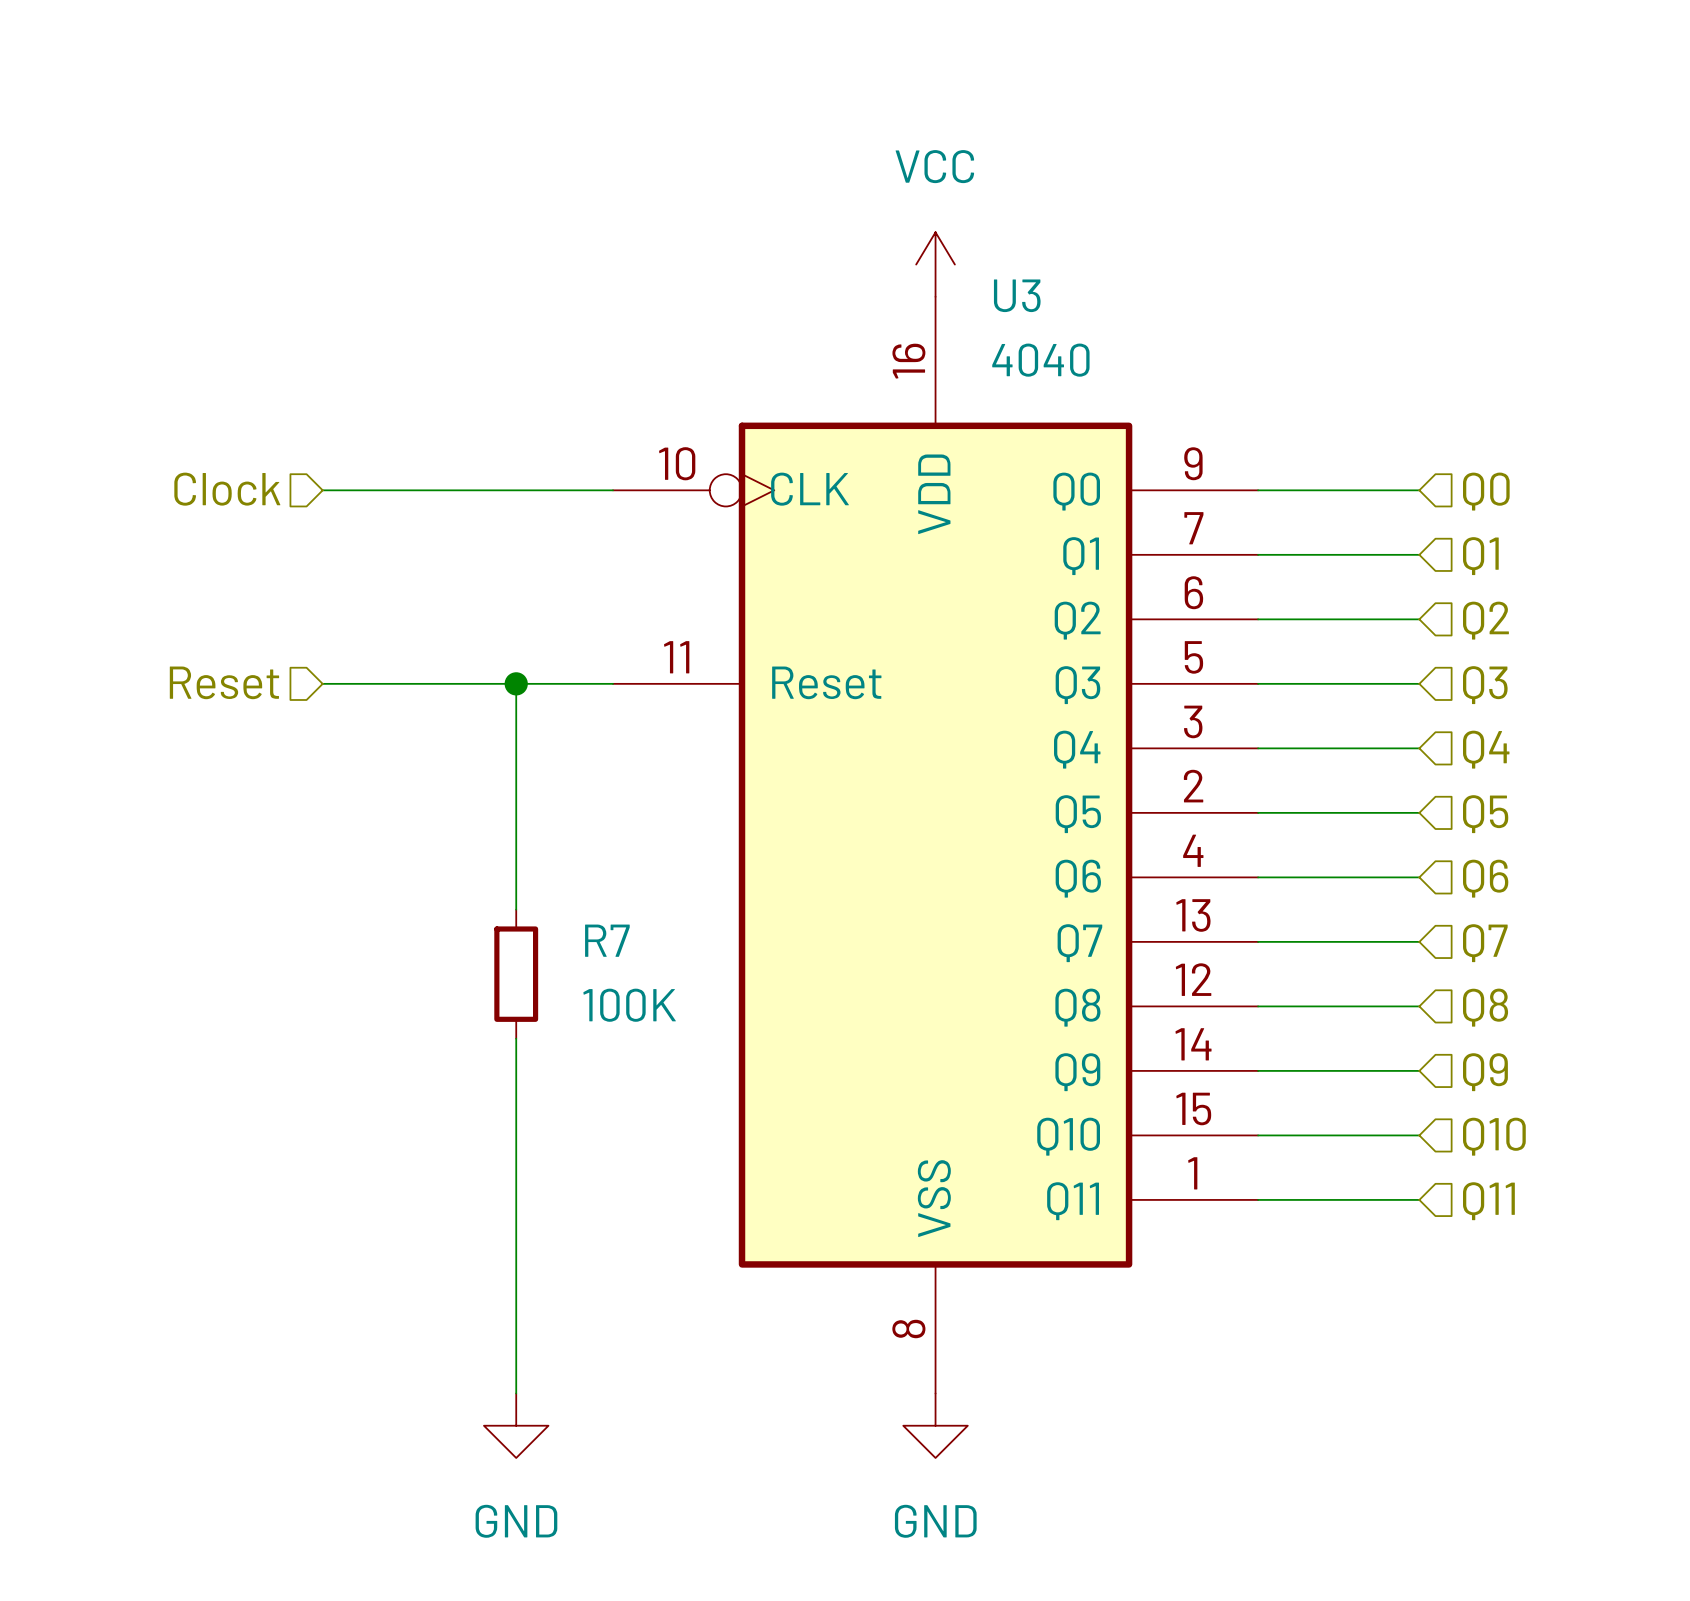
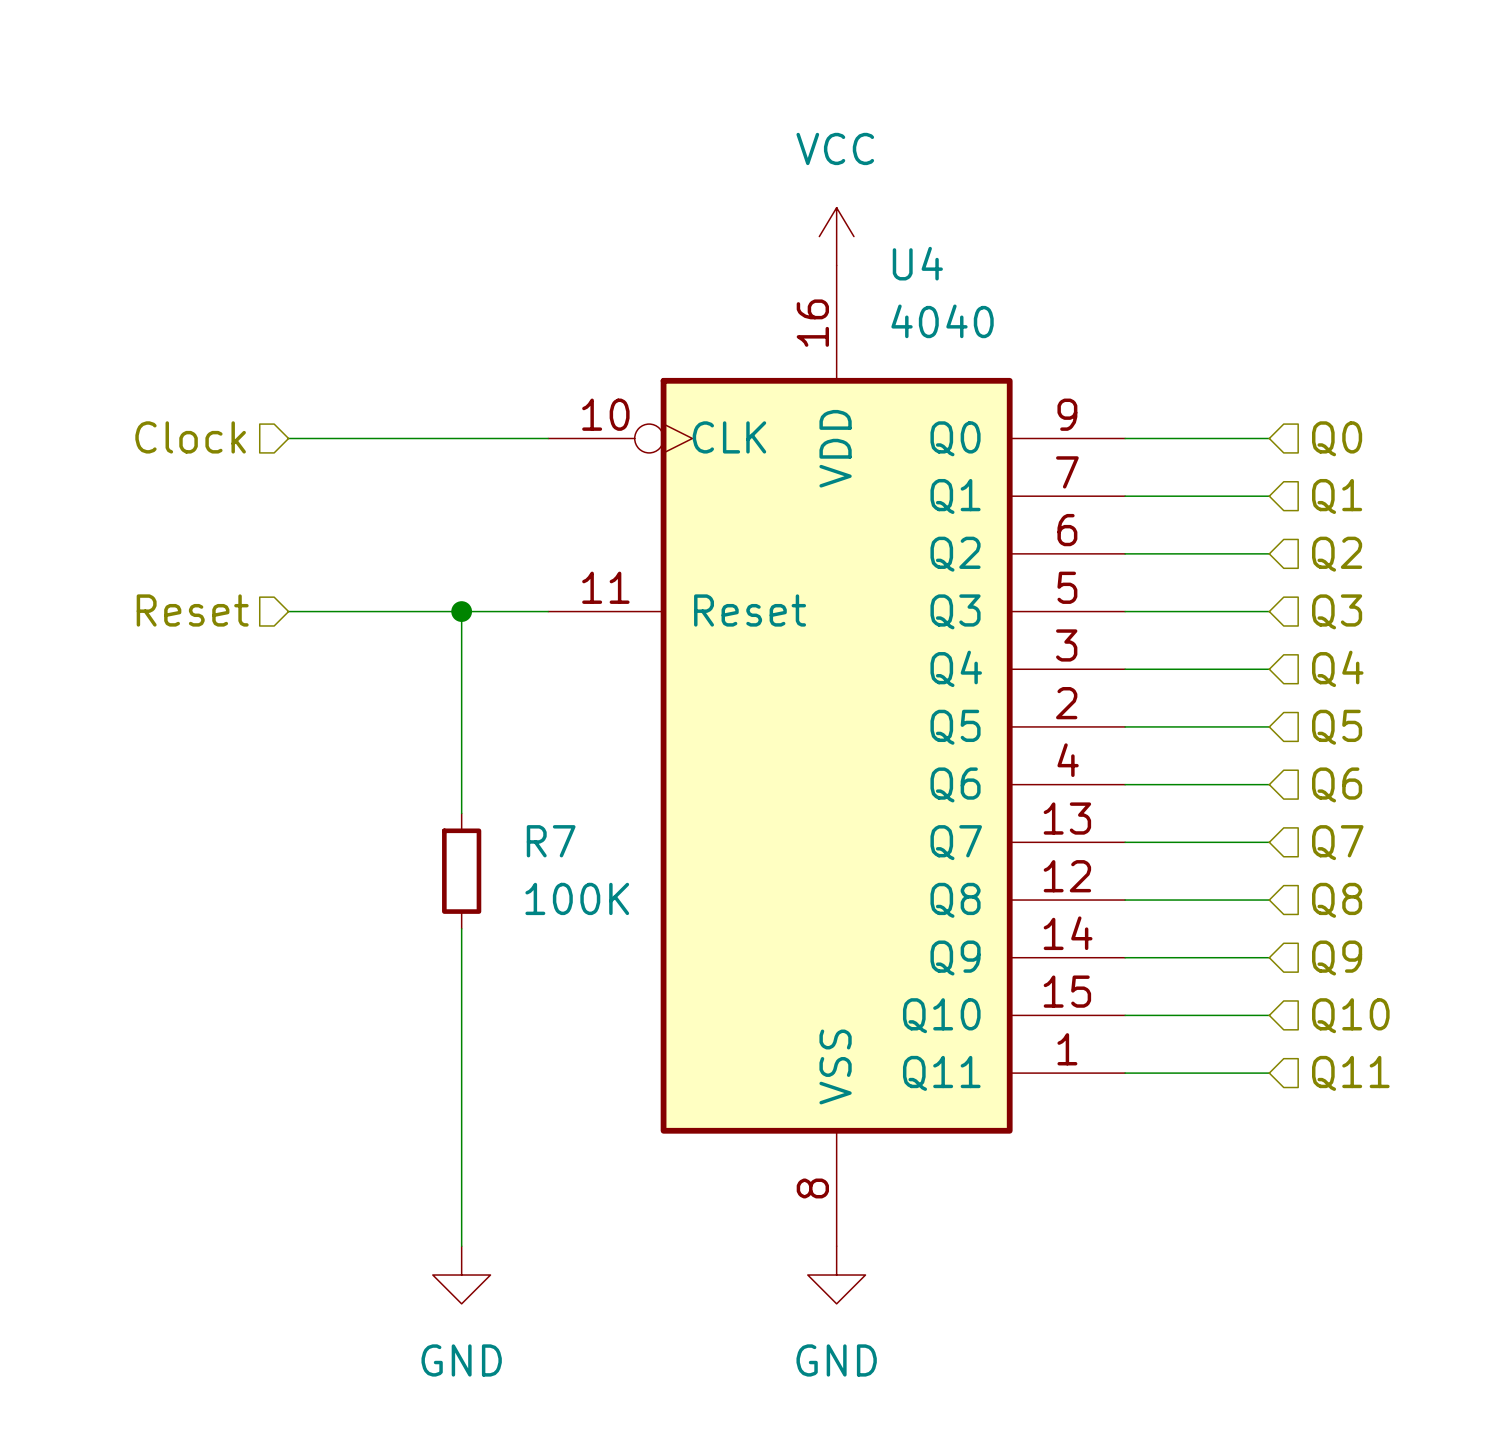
U3 name: U3 (1017, 295) -> U4 (917, 263)

